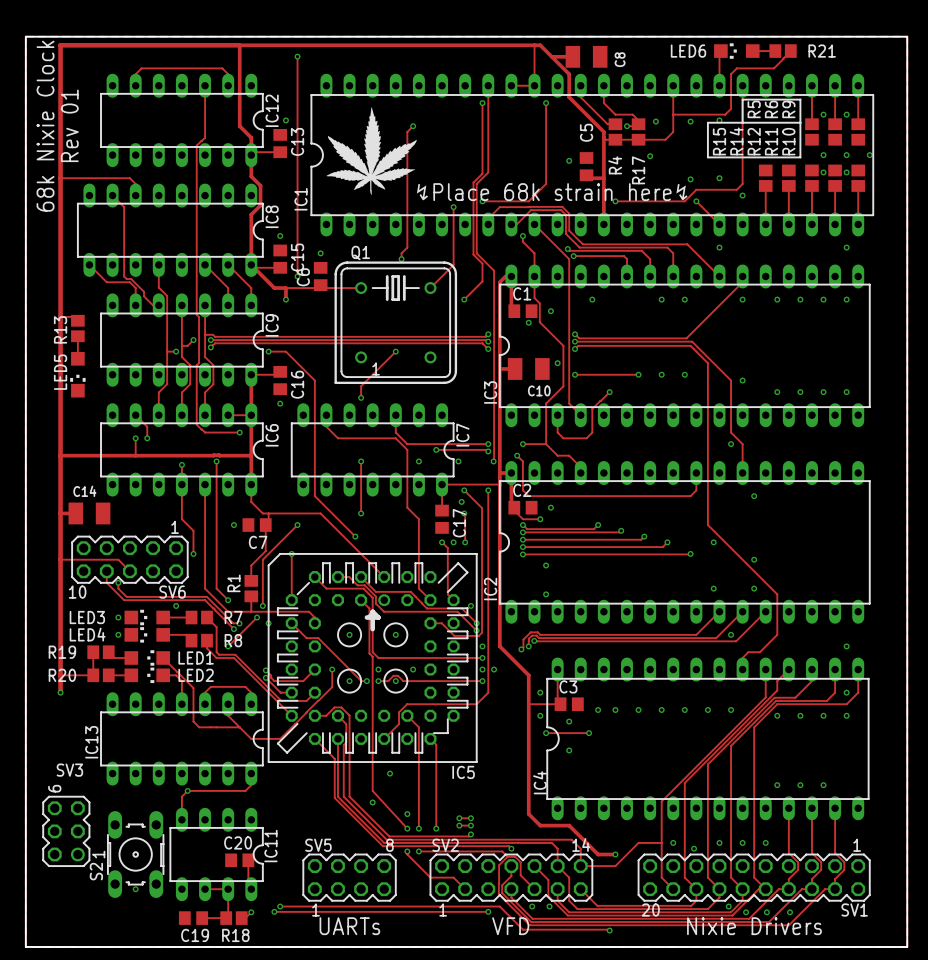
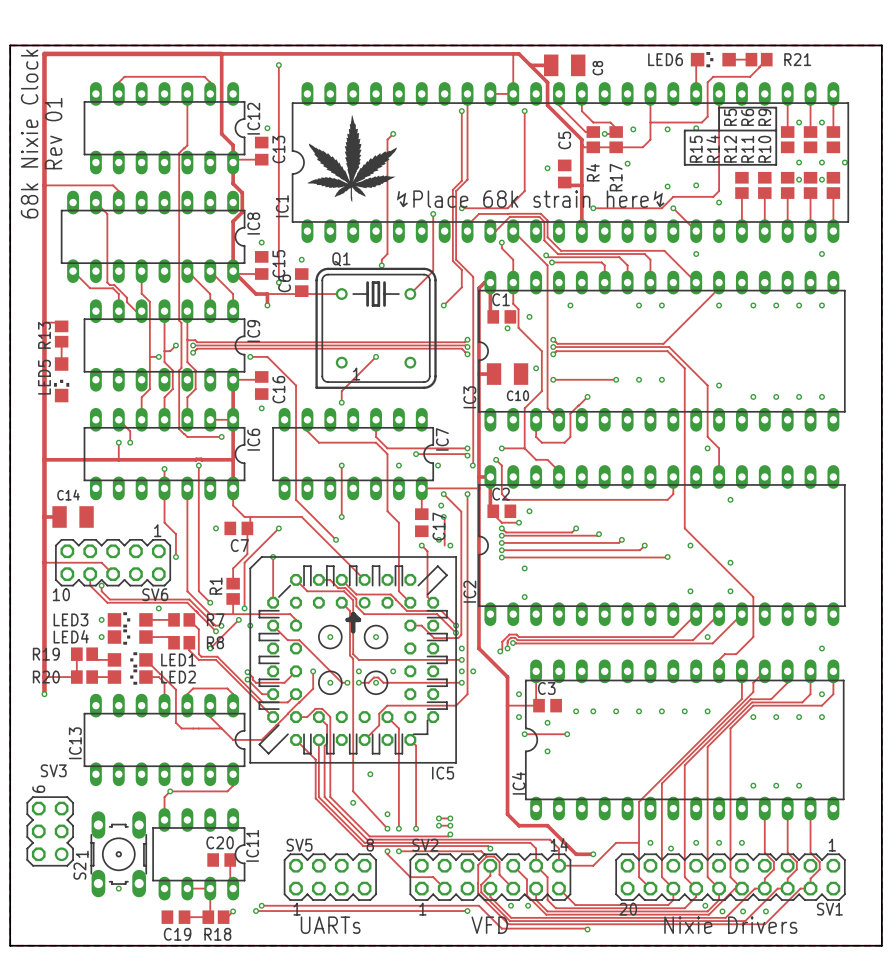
via: none -> (438, 539)
via: (453, 542) -> none
via: (465, 542) -> none
via: none -> (450, 545)
via: (470, 605) -> none

